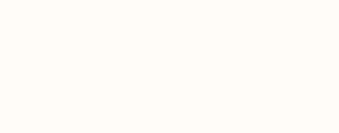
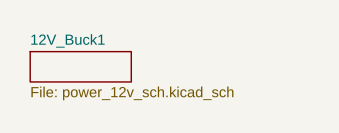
sheet 12V_Buck1: none -> File: power_12v_sch.kicad_sch (80, 66)

